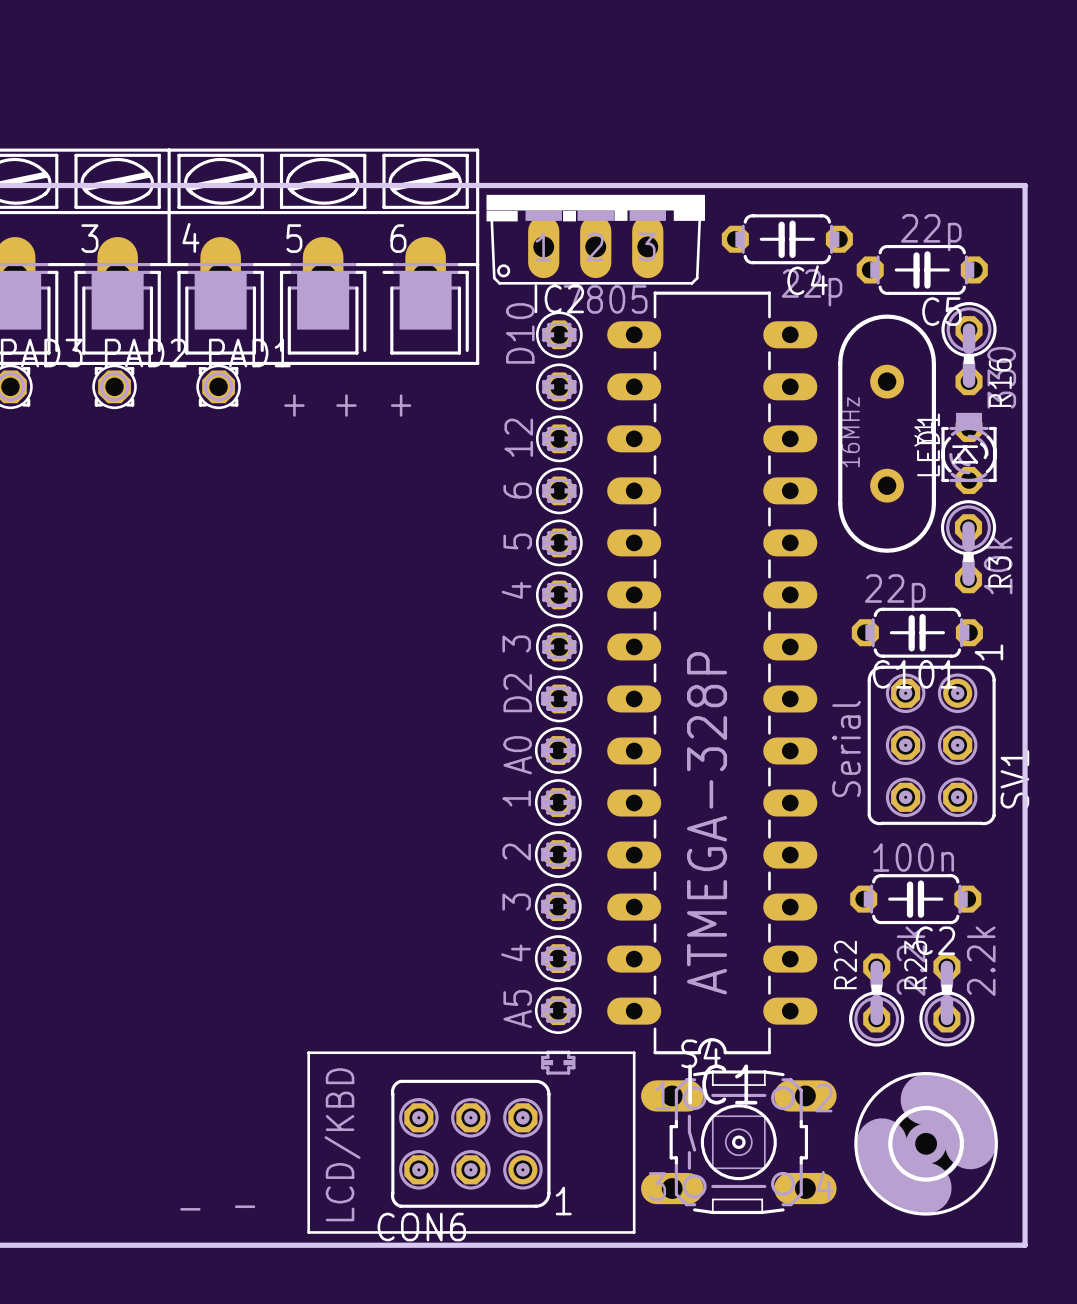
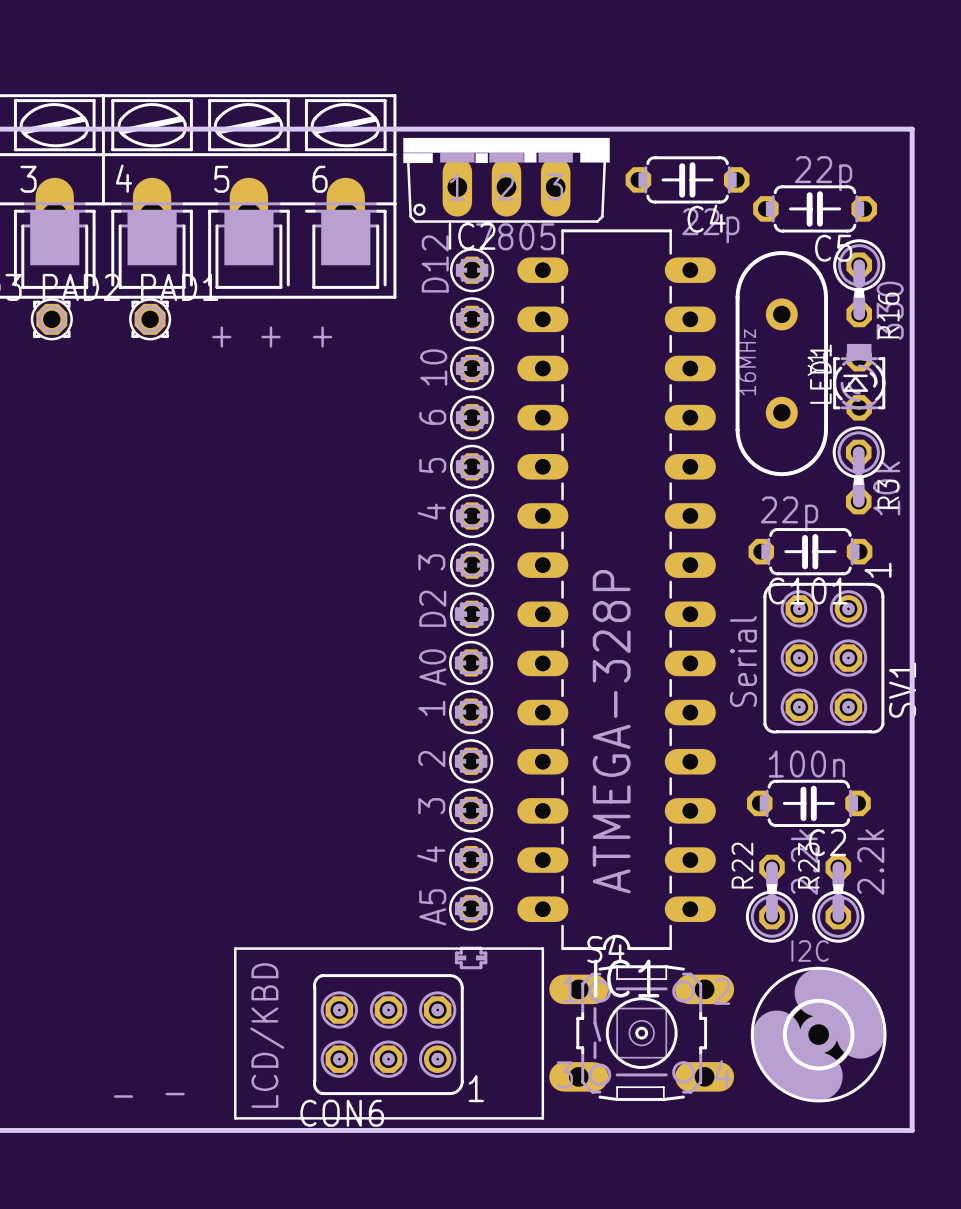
text: D10 (520, 333) -> D12 (435, 263)
text: 12 (518, 437) -> 10 (433, 367)
text: none -> I2C (810, 951)

